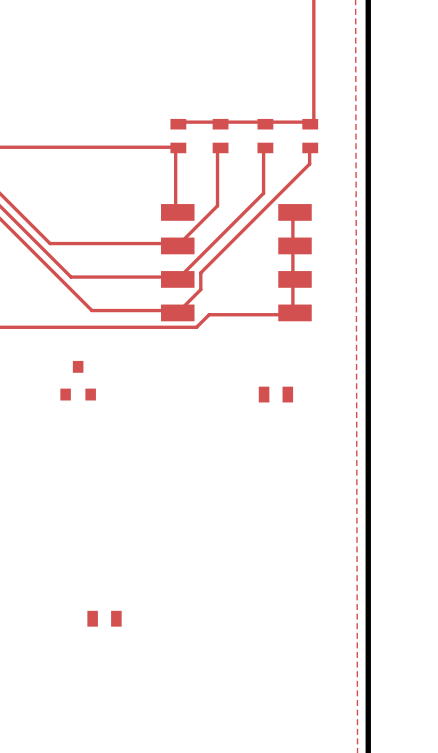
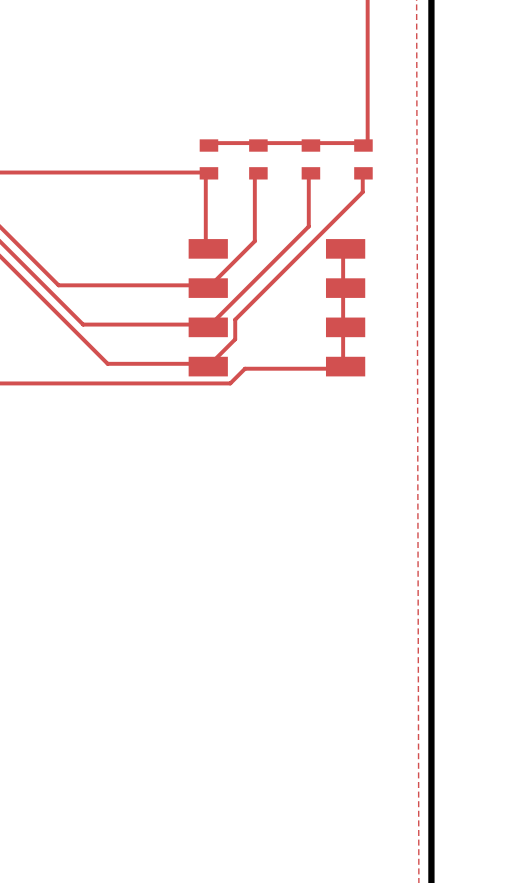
part: (78, 380) -> none
part: (275, 394) -> none
part: (104, 618) -> none

